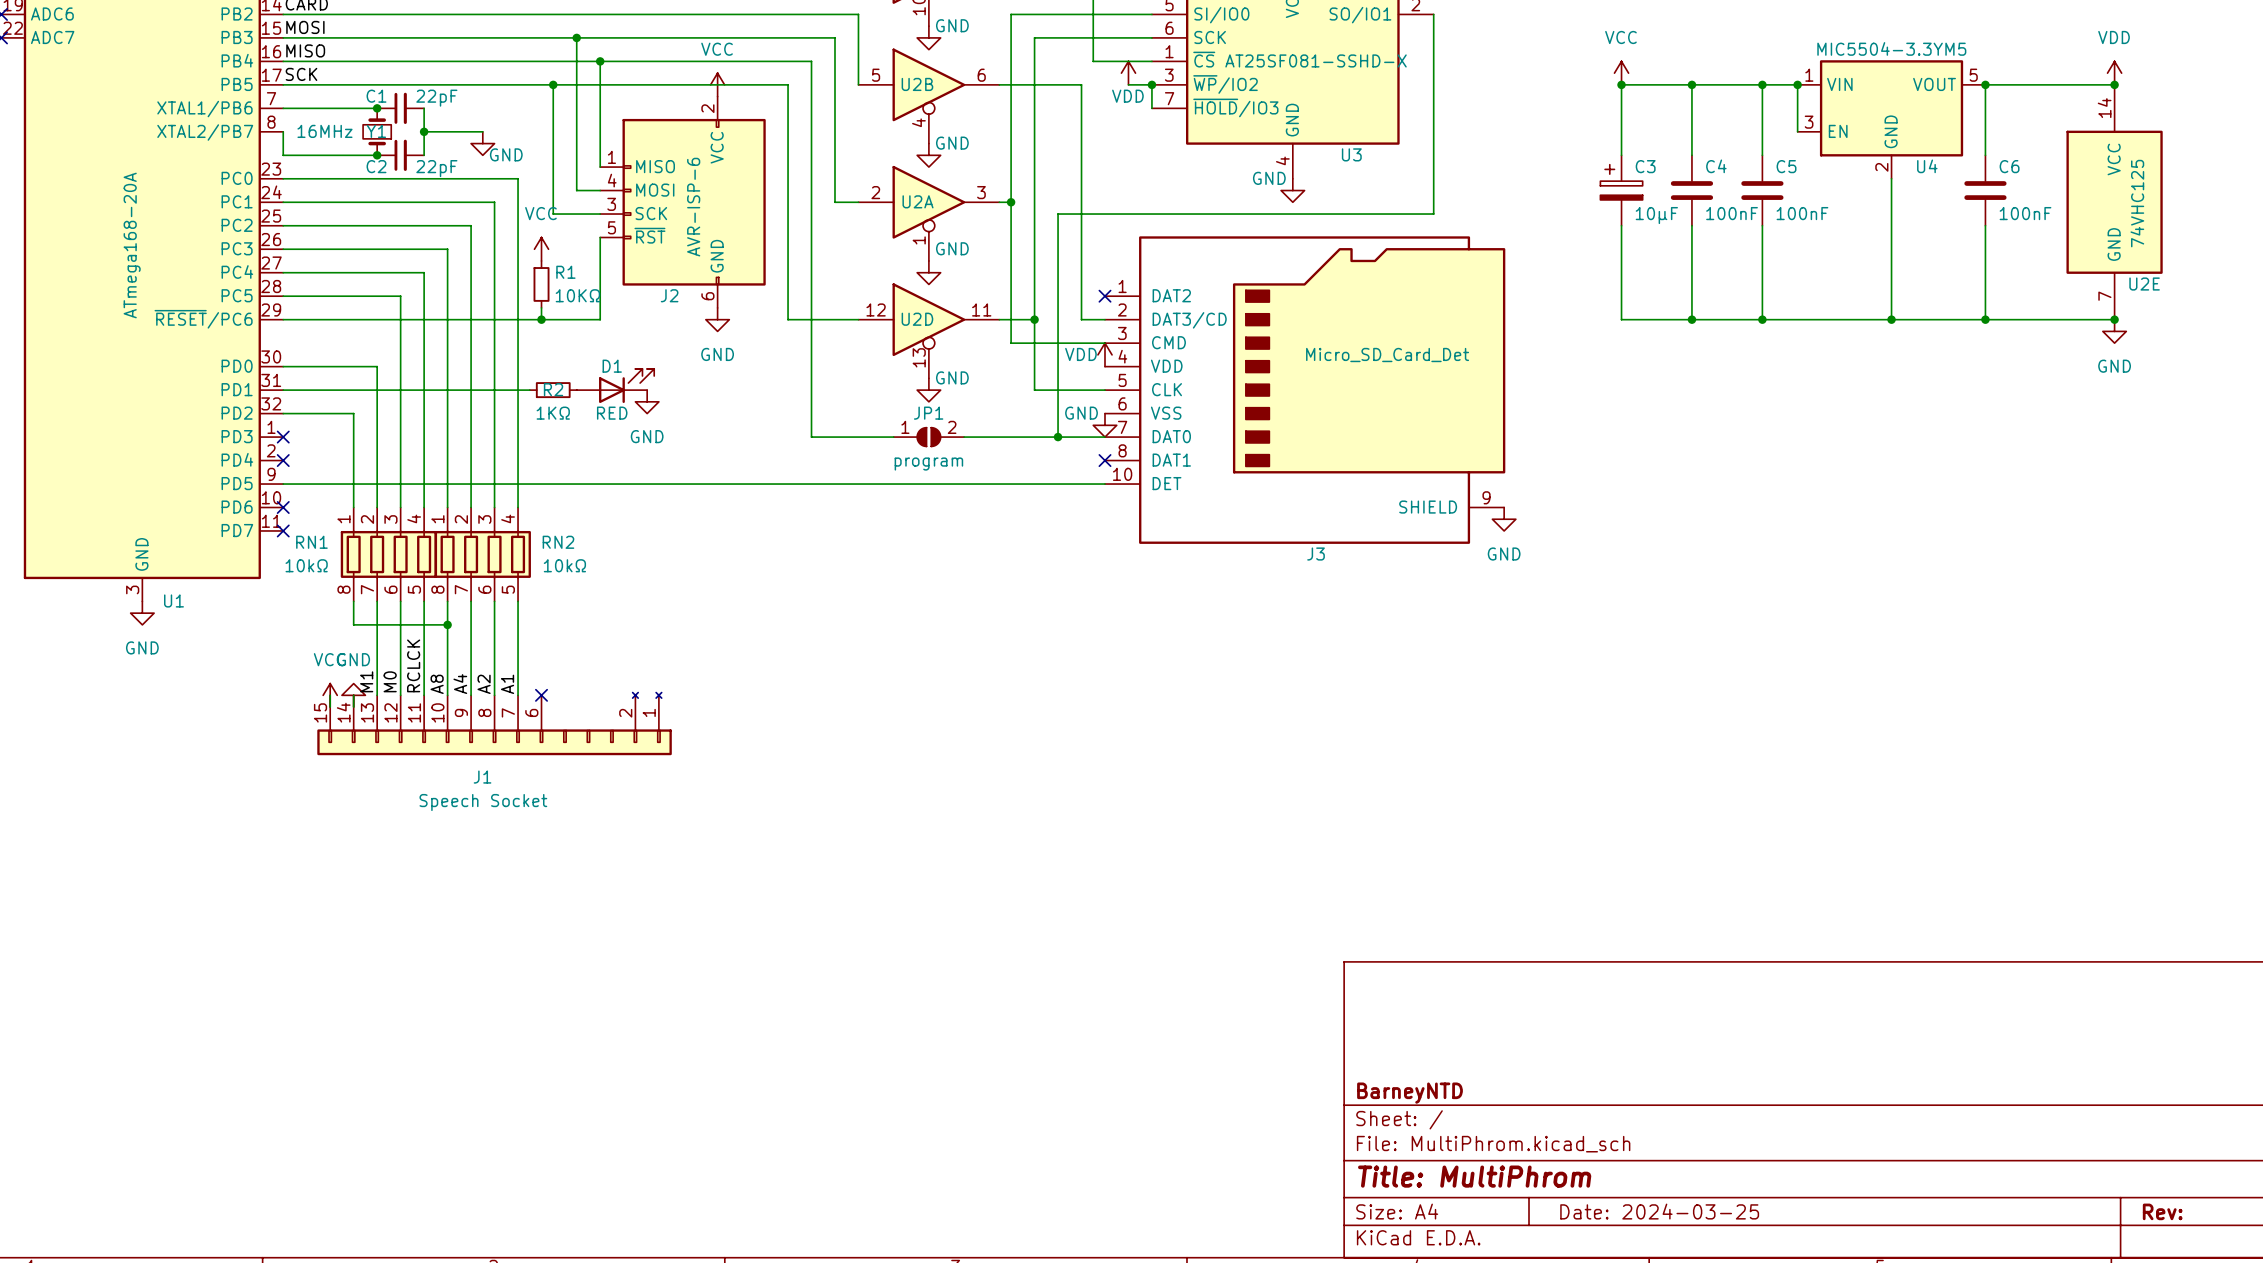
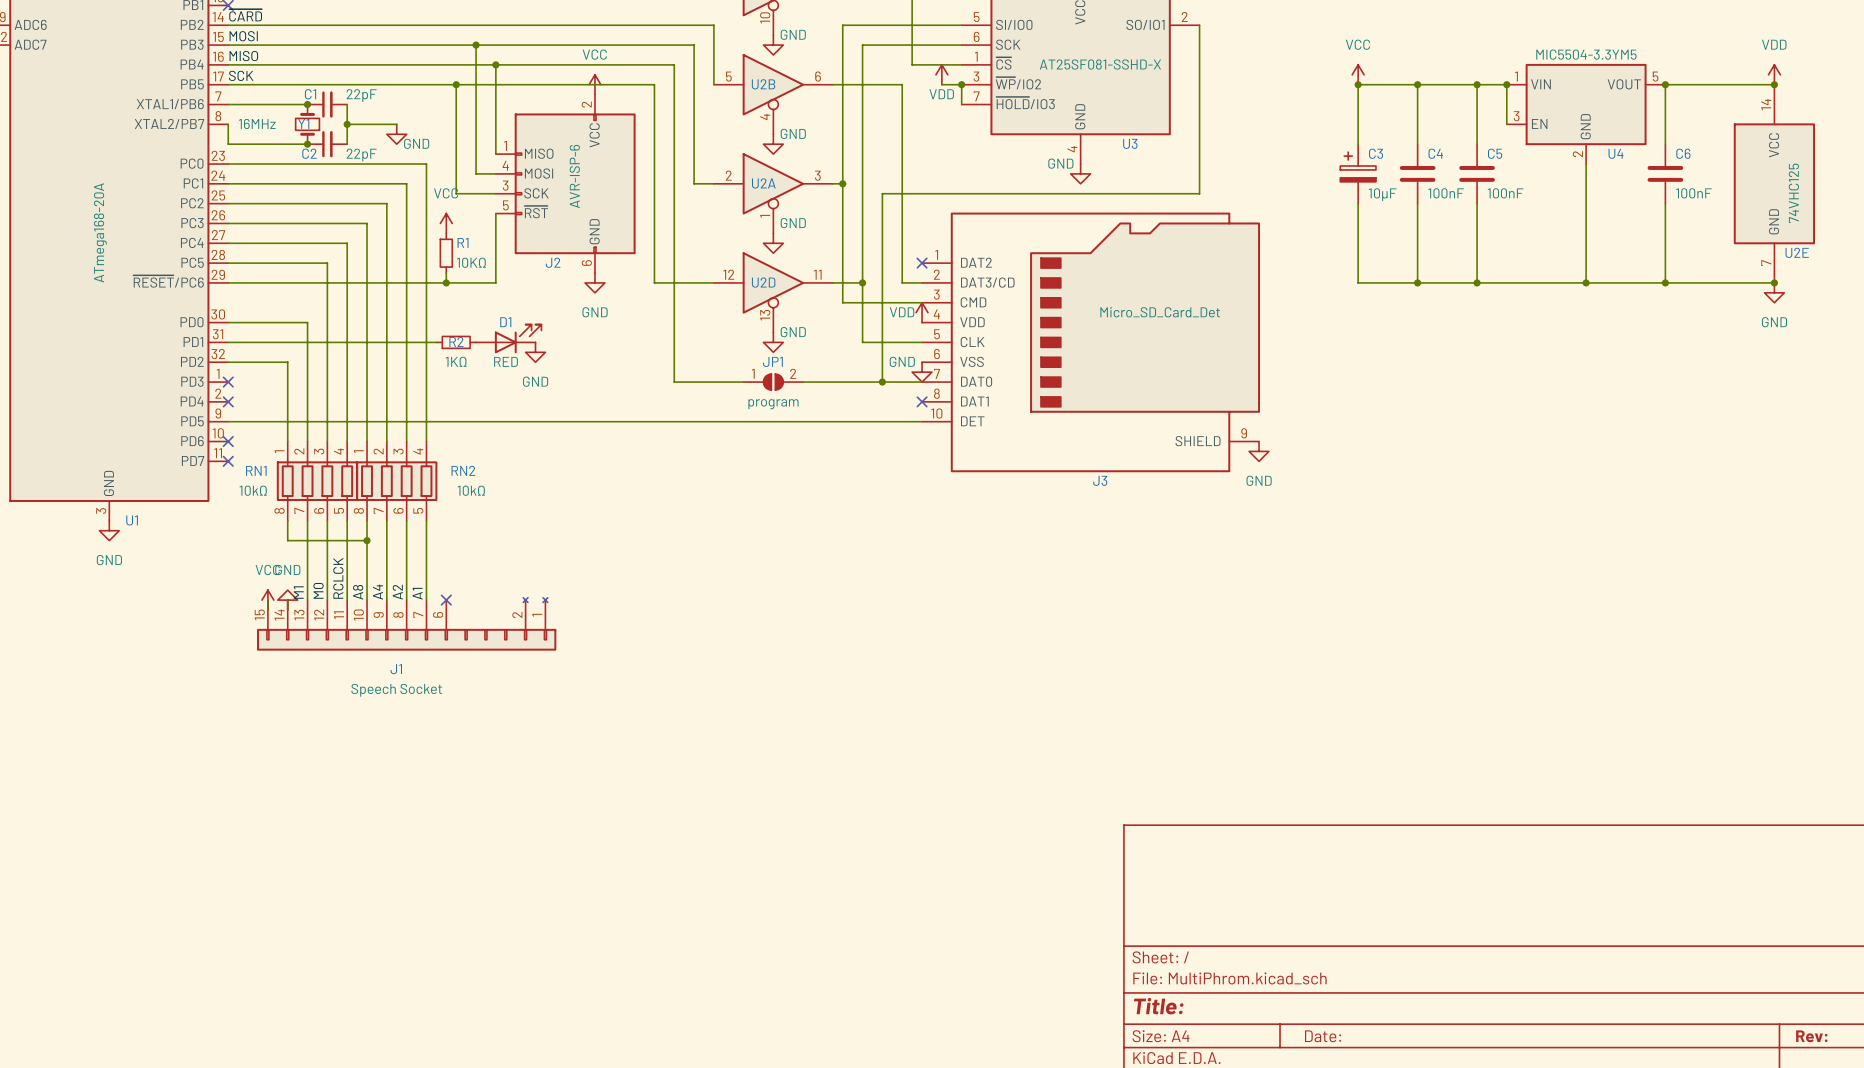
title block: BarneyNTD (1410, 1093) -> none
title block: Title: MultiPhrom (1474, 1176) -> Title: (1158, 1006)
title block: Date: 2024-03-25 (1659, 1211) -> Date: (1323, 1036)

